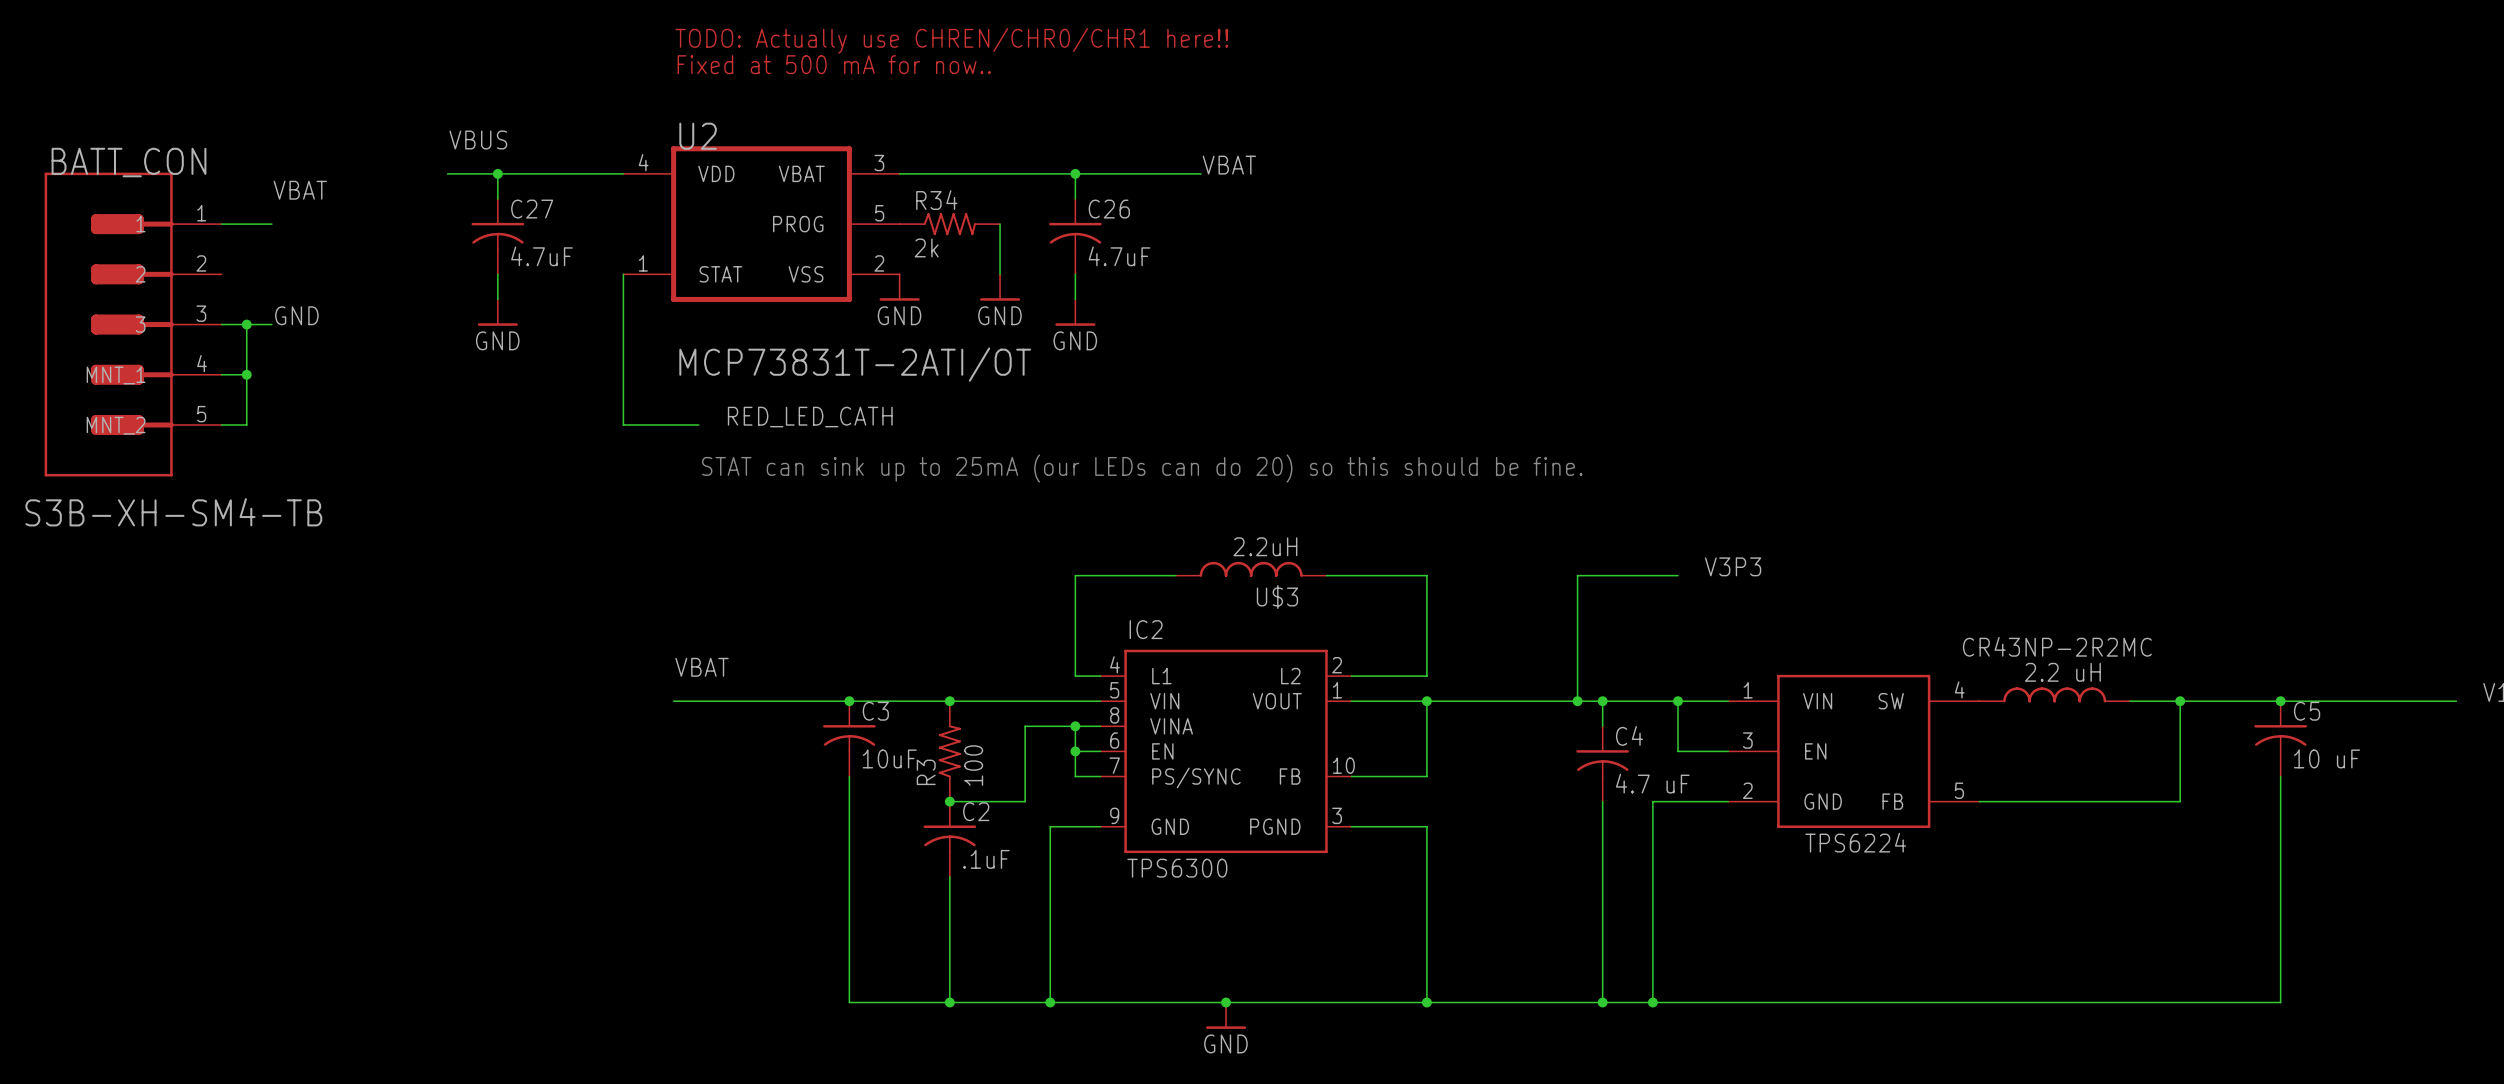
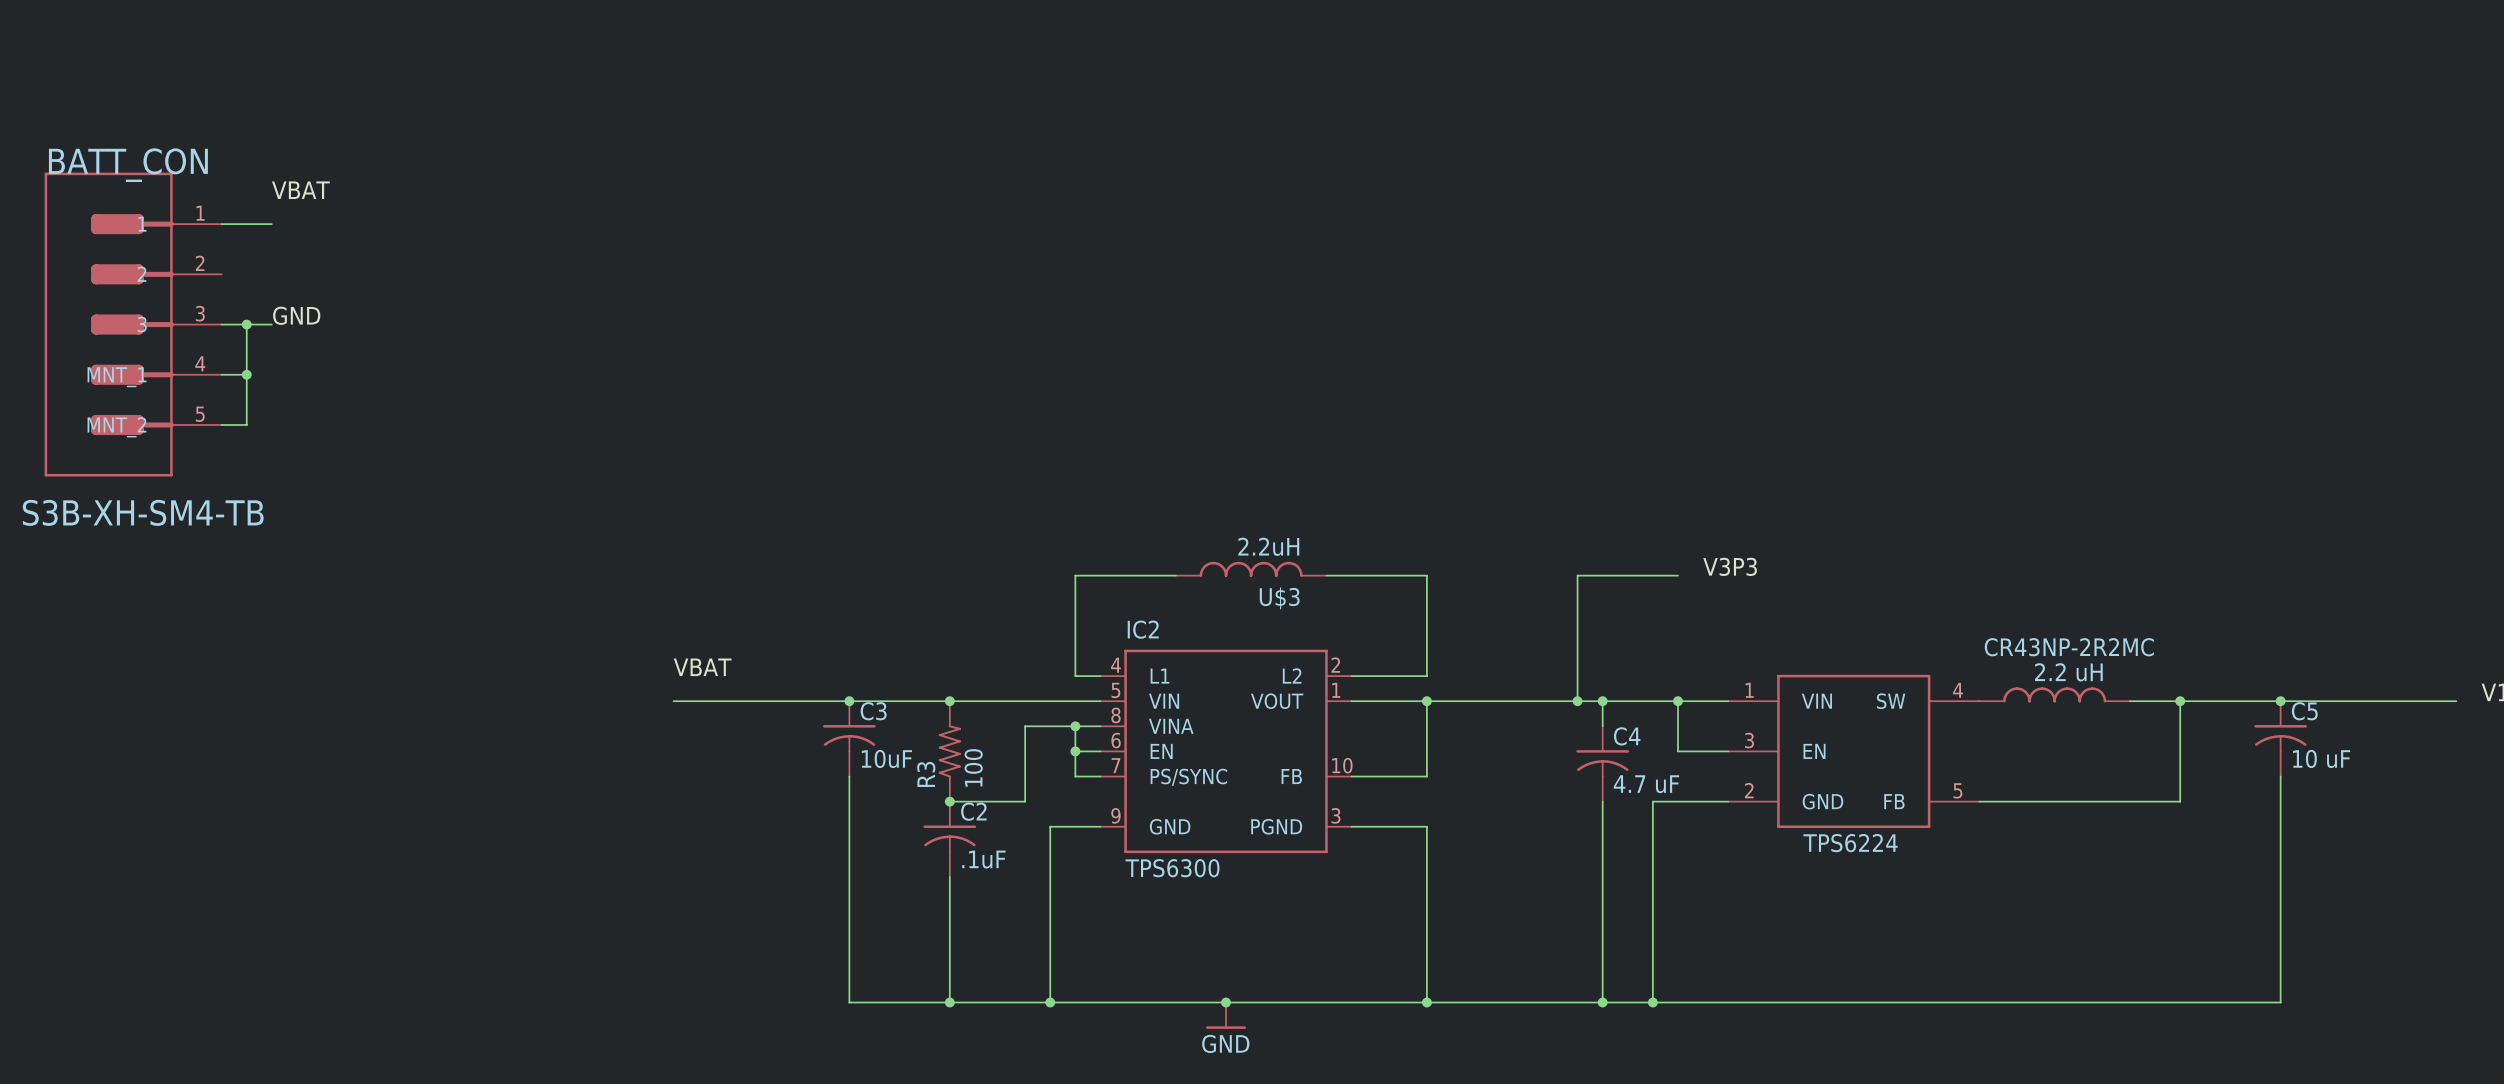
text: TODO: Actually use CHREN/CHR0/CHR1 here!! (951, 40) -> none
text: Fixed at 500 mA for now.. (834, 64) -> none
label: VBUS (478, 139) -> none
label: VBAT (1229, 165) -> none
wire: (447, 173) (623, 173) -> none
wire: (497, 173) (497, 199) -> none
junction: (497, 173) -> none
wire: (899, 173) (1200, 173) -> none
wire: (1075, 173) (1075, 199) -> none
junction: (1075, 173) -> none
U2: (761, 224) -> none
R34: 2k (949, 224) -> none
wire: (1000, 224) (1000, 274) -> none
C27: 4.7uF (497, 236) -> none
C26: 4.7uF (1075, 236) -> none
wire: (497, 274) (497, 299) -> none
wire: (623, 274) (623, 424) (698, 424) -> none
wire: (1075, 274) (1075, 299) -> none
power symbol: GND (899, 287) -> none
power symbol: GND (1000, 287) -> none
power symbol: GND (497, 312) -> none
power symbol: GND (1075, 312) -> none
label: RED_LED_CATH (810, 417) -> none
text: STAT can sink up to 25mA (our LEDs can do 20) so this should be fine. (1142, 468) -> none

